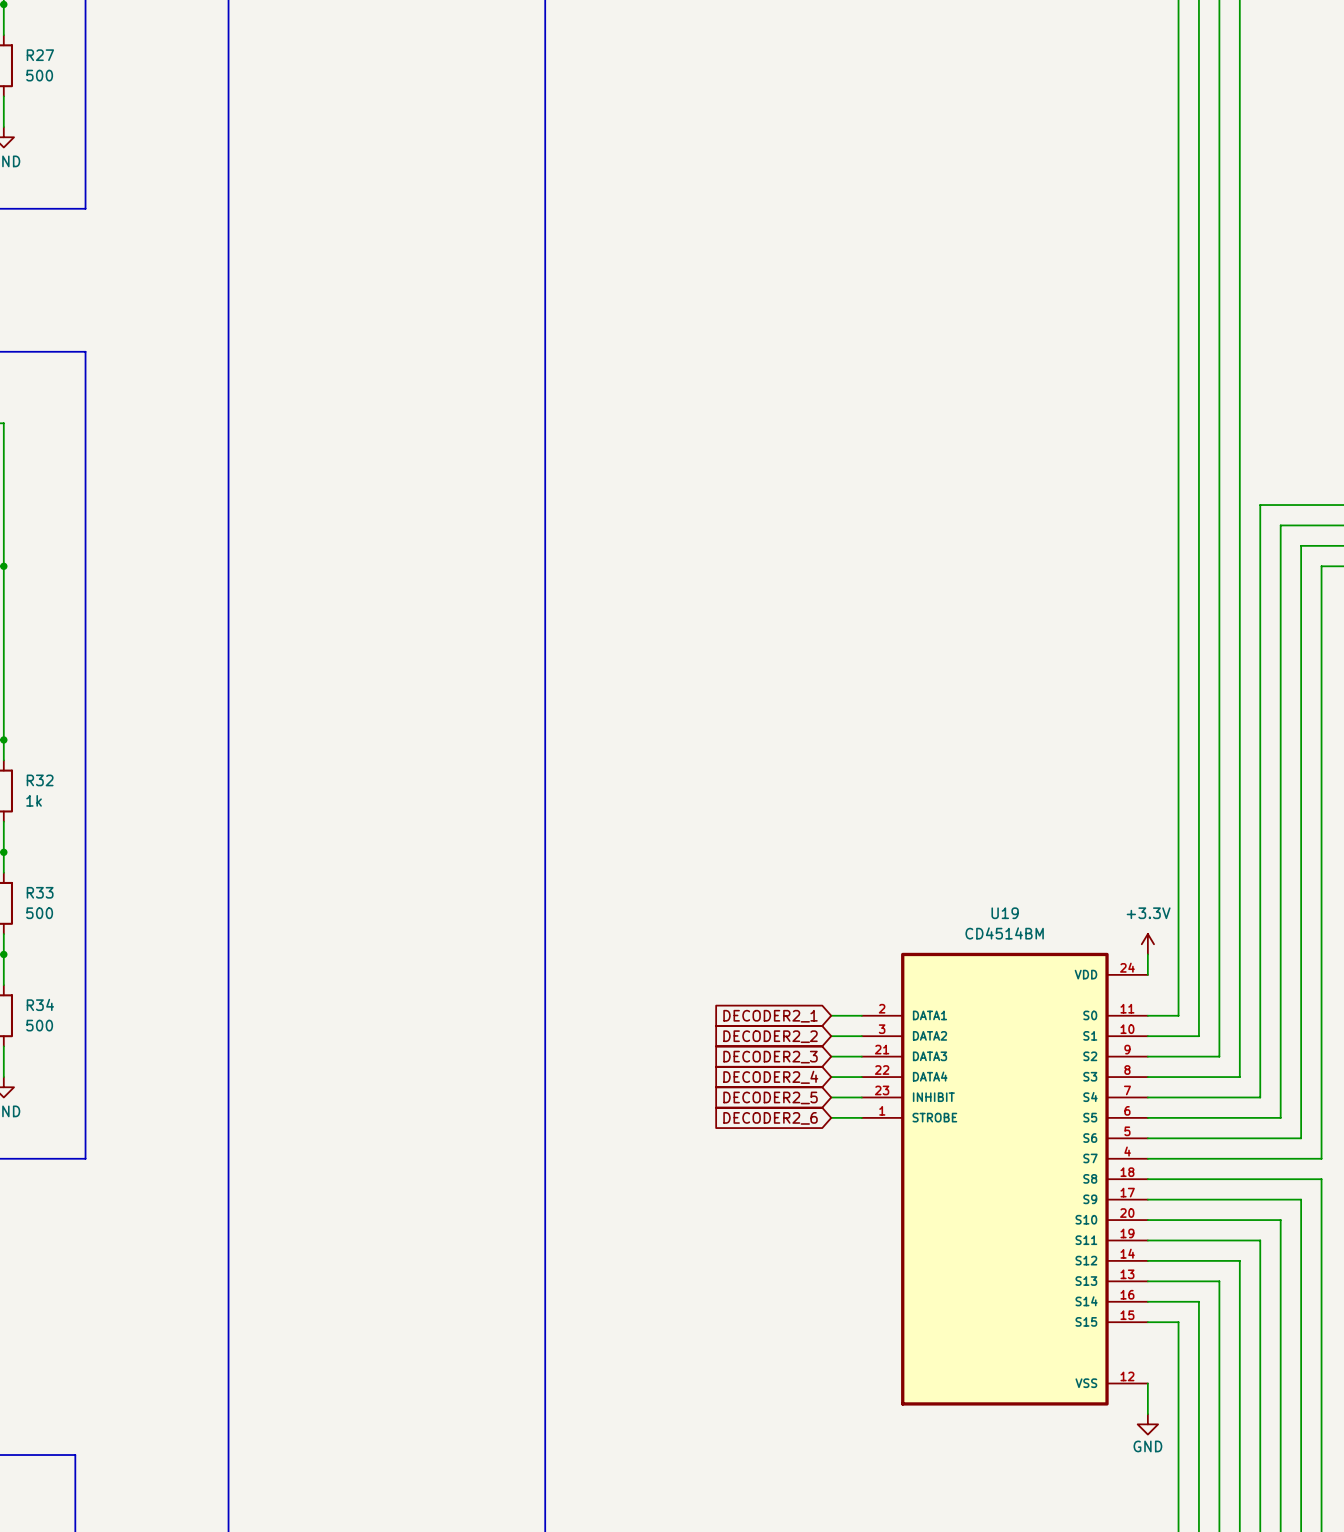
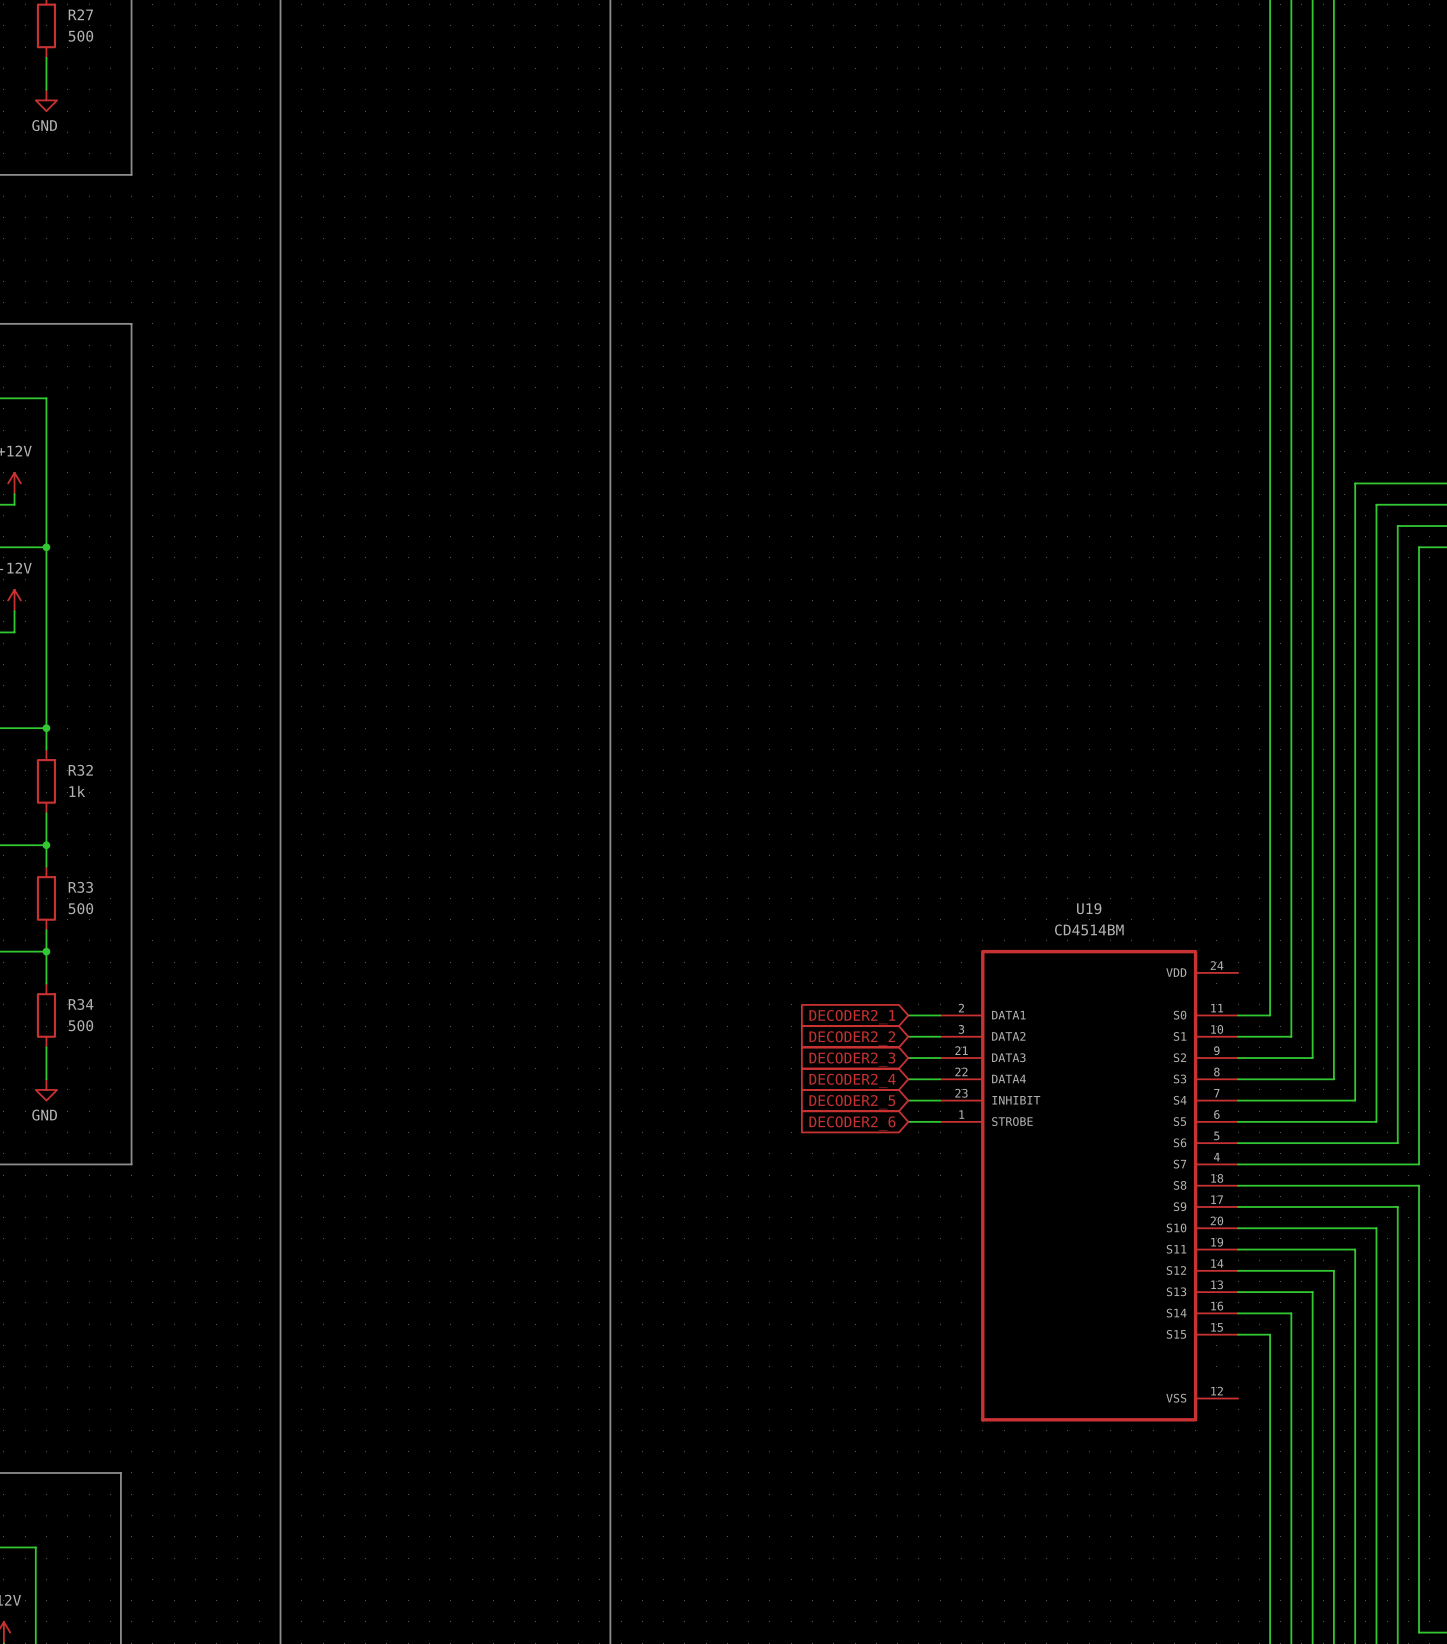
power symbol: +3.3V (1147, 944) -> none
wire: (1147, 954) (1147, 974) -> none
wire: (1147, 1383) (1147, 1414) -> none
power symbol: GND (1147, 1424) -> none

